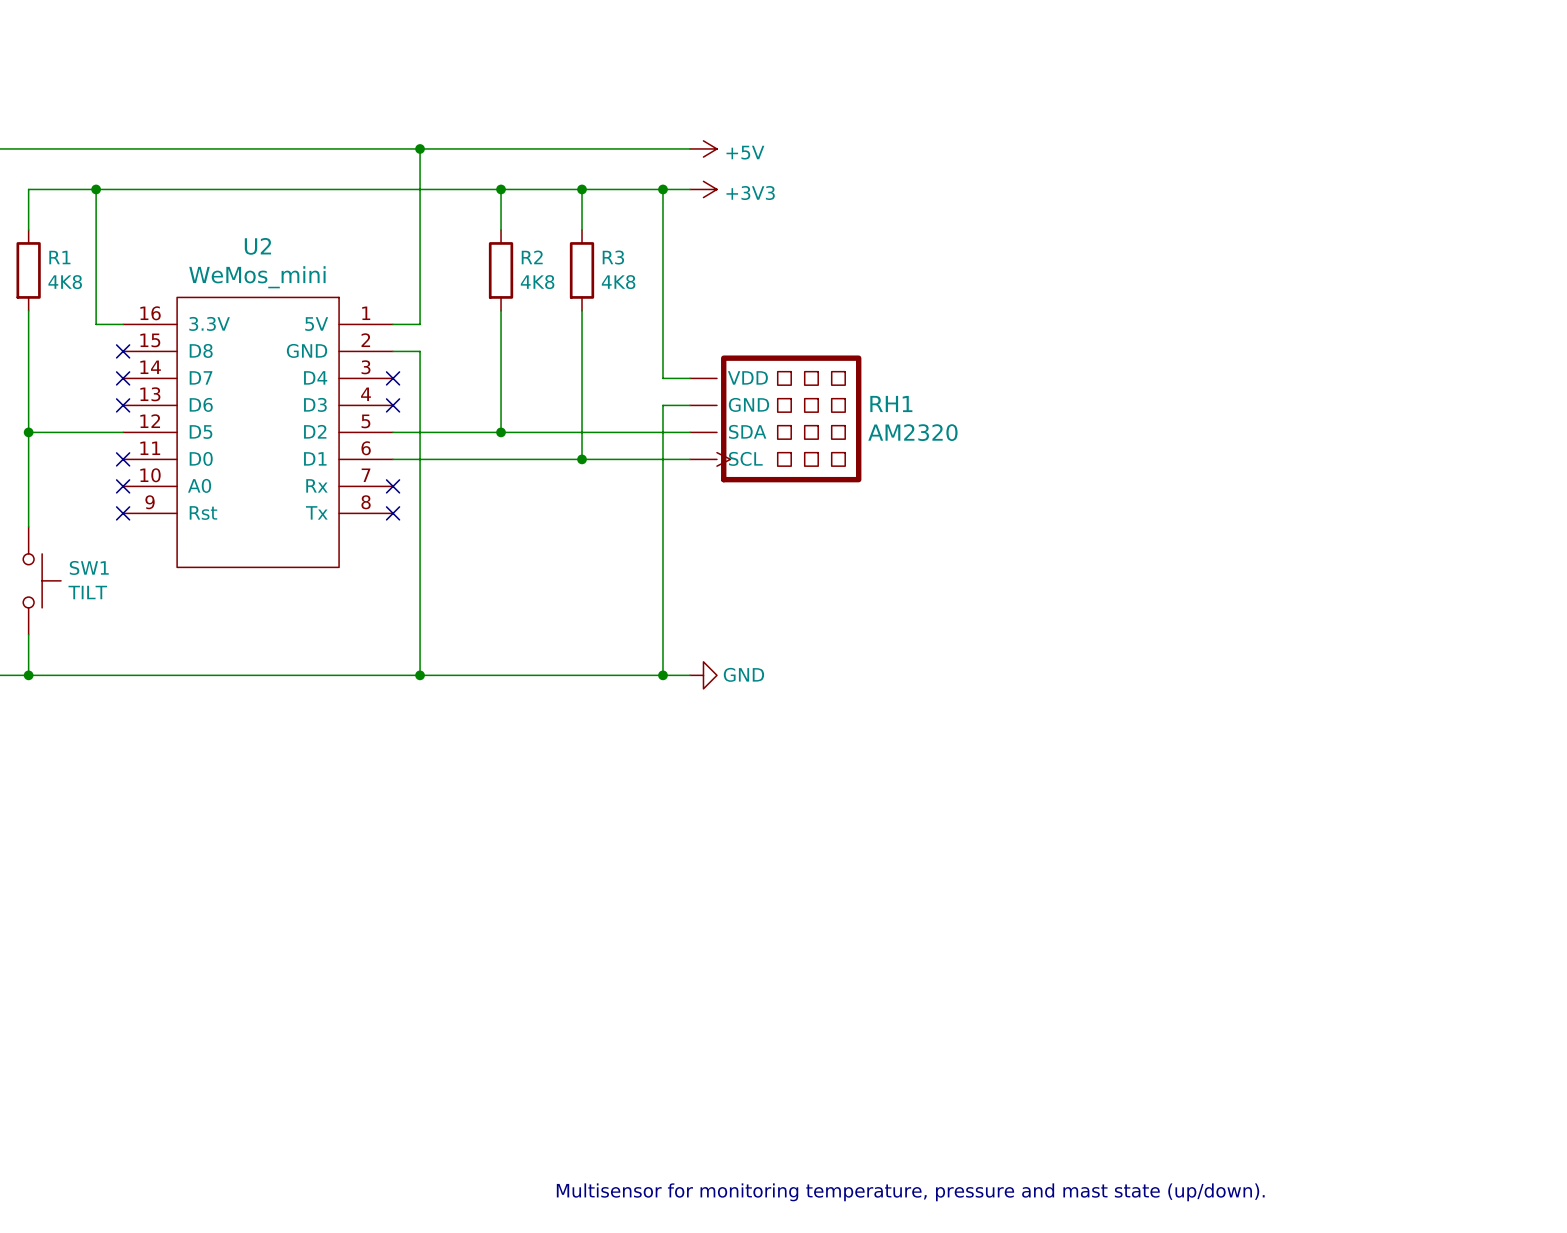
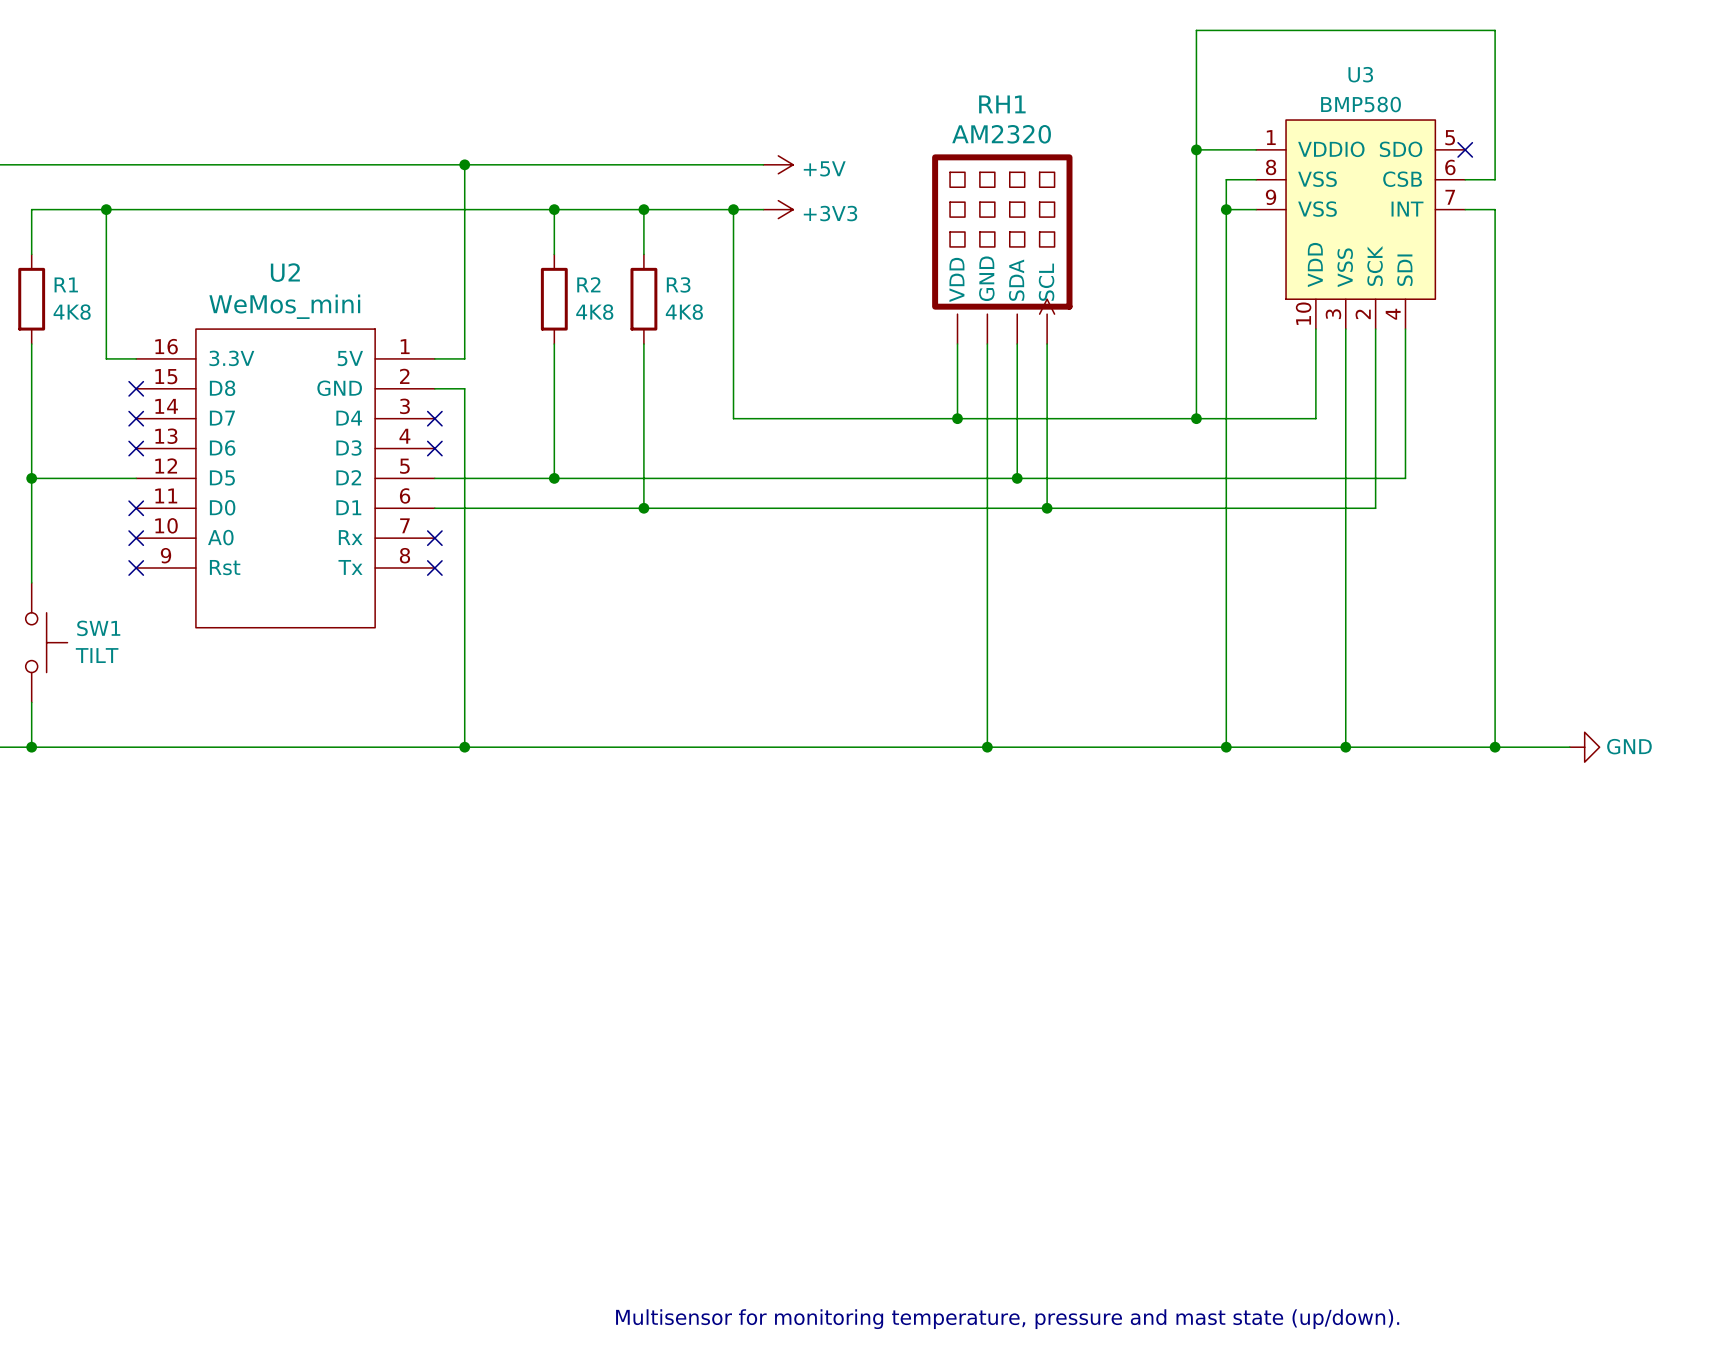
wire: none -> (1196, 149) (1256, 149)
junction: none -> (1196, 149)
no-connect mark: none -> (1465, 149)
wire: none -> (1256, 179) (1226, 179) (1226, 747)
wire: none -> (1465, 179) (1495, 179) (1495, 30) (1196, 30) (1196, 418)
wire: none -> (1226, 209) (1256, 209)
junction: none -> (1226, 209)
wire: none -> (1465, 209) (1495, 209) (1495, 747)
U3: none -> BMP580 (1360, 224)
wire: none -> (1315, 329) (1315, 418) (763, 418)
wire: none -> (1345, 329) (1345, 747)
wire: none -> (1375, 329) (1375, 508) (763, 508)
wire: none -> (1405, 329) (1405, 478) (763, 478)
wire: none -> (957, 344) (957, 418)
wire: none -> (987, 344) (987, 747)
wire: none -> (1017, 344) (1017, 478)
wire: none -> (1047, 344) (1047, 508)
junction: none -> (957, 418)
junction: none -> (1196, 418)
wire: (689, 405) (662, 405) (662, 675) -> none
RH1 position: (775, 418) -> (1002, 249)
RH1 rotation: 0° (791, 418) -> 90° counterclockwise (1002, 232)
RH1 value position: AM2320 (912, 432) -> AM2320 (1001, 134)
junction: none -> (1017, 478)
junction: none -> (1047, 508)
junction: (662, 675) -> none
wire: none -> (763, 747) (1569, 747)
power symbol: GND (703, 675) -> none
junction: none -> (987, 747)
junction: none -> (1226, 747)
junction: none -> (1345, 747)
junction: none -> (1495, 747)
power symbol: none -> GND (1584, 747)

